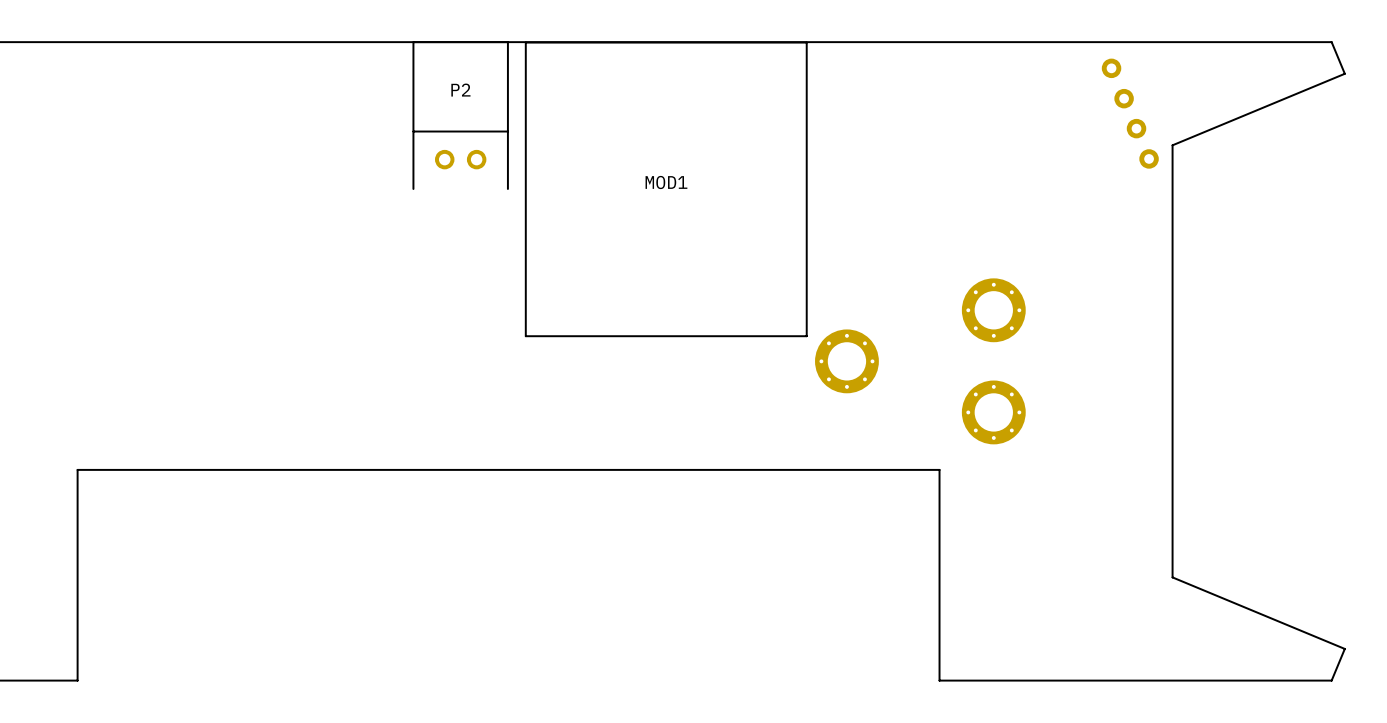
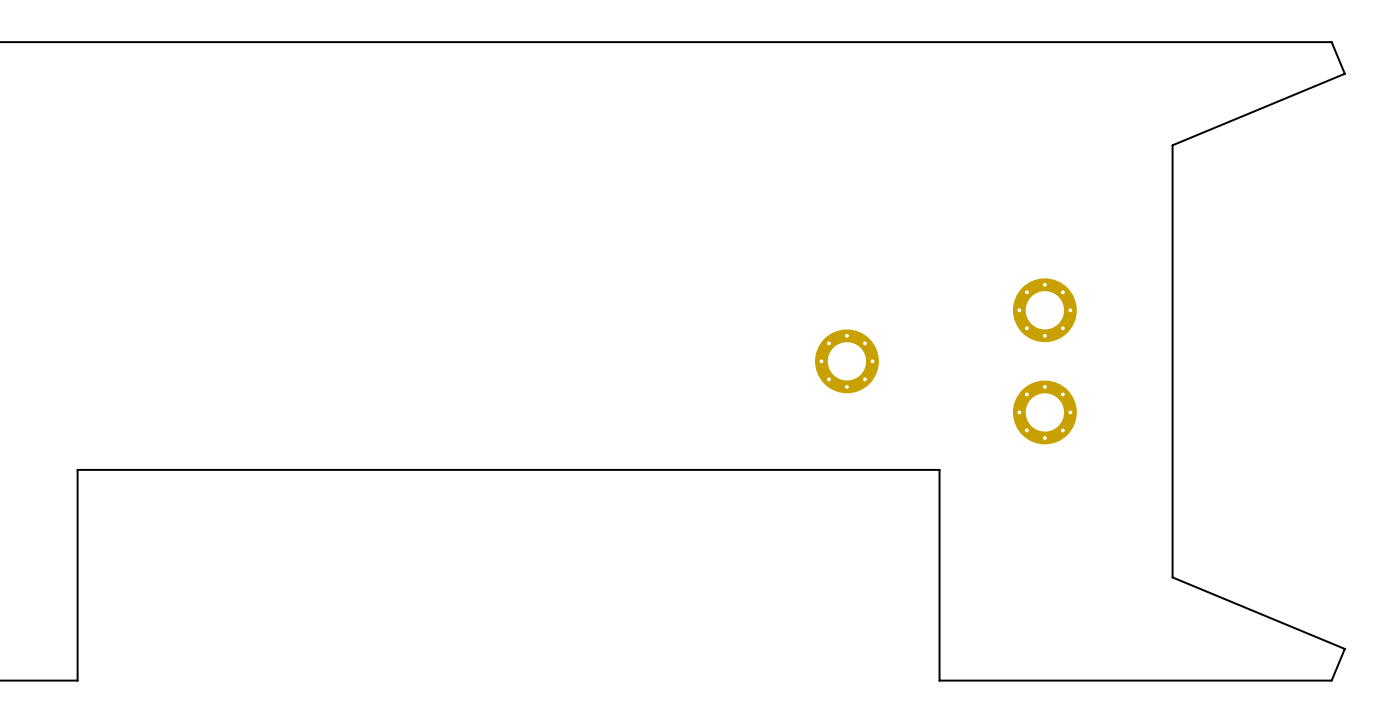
part: (1130, 113) -> none
P2: (460, 115) -> none
MOD1: (666, 189) -> none
part position: (993, 310) -> (1044, 310)
part position: (993, 412) -> (1044, 412)

